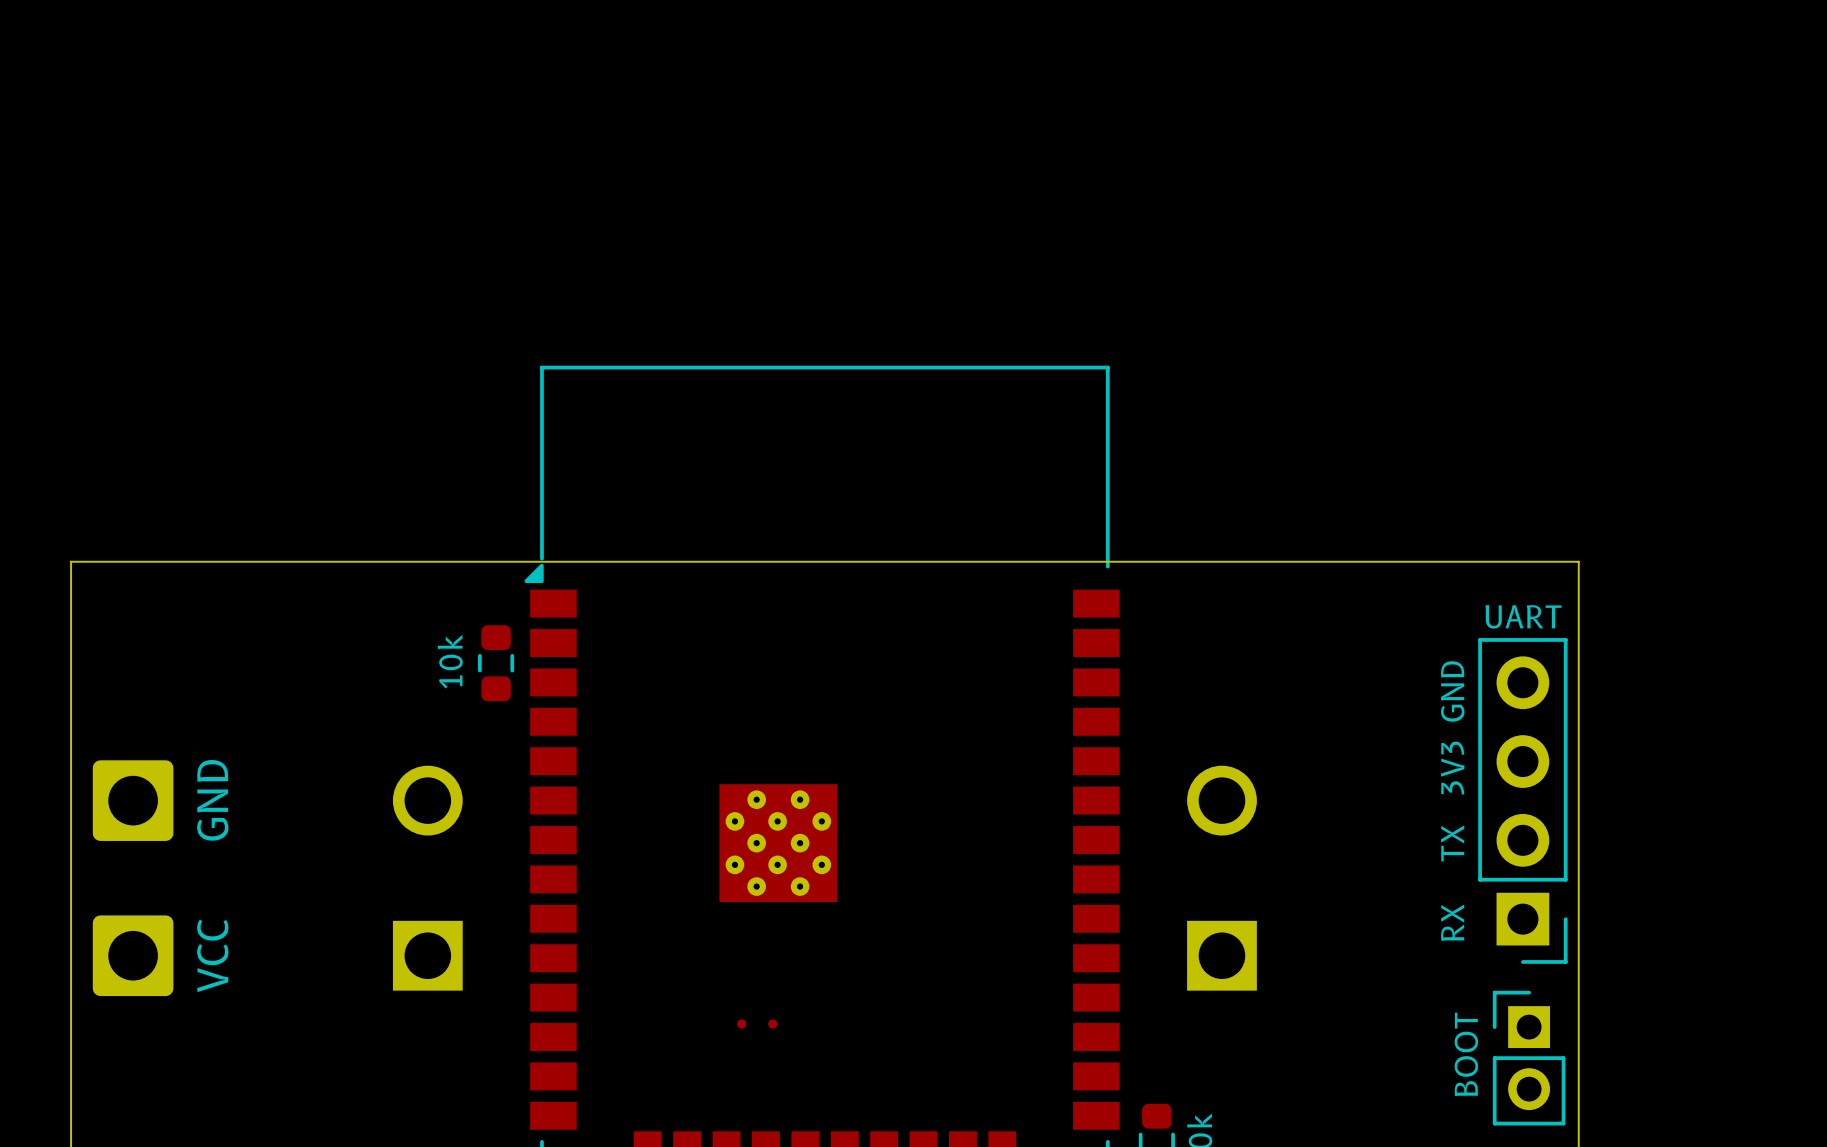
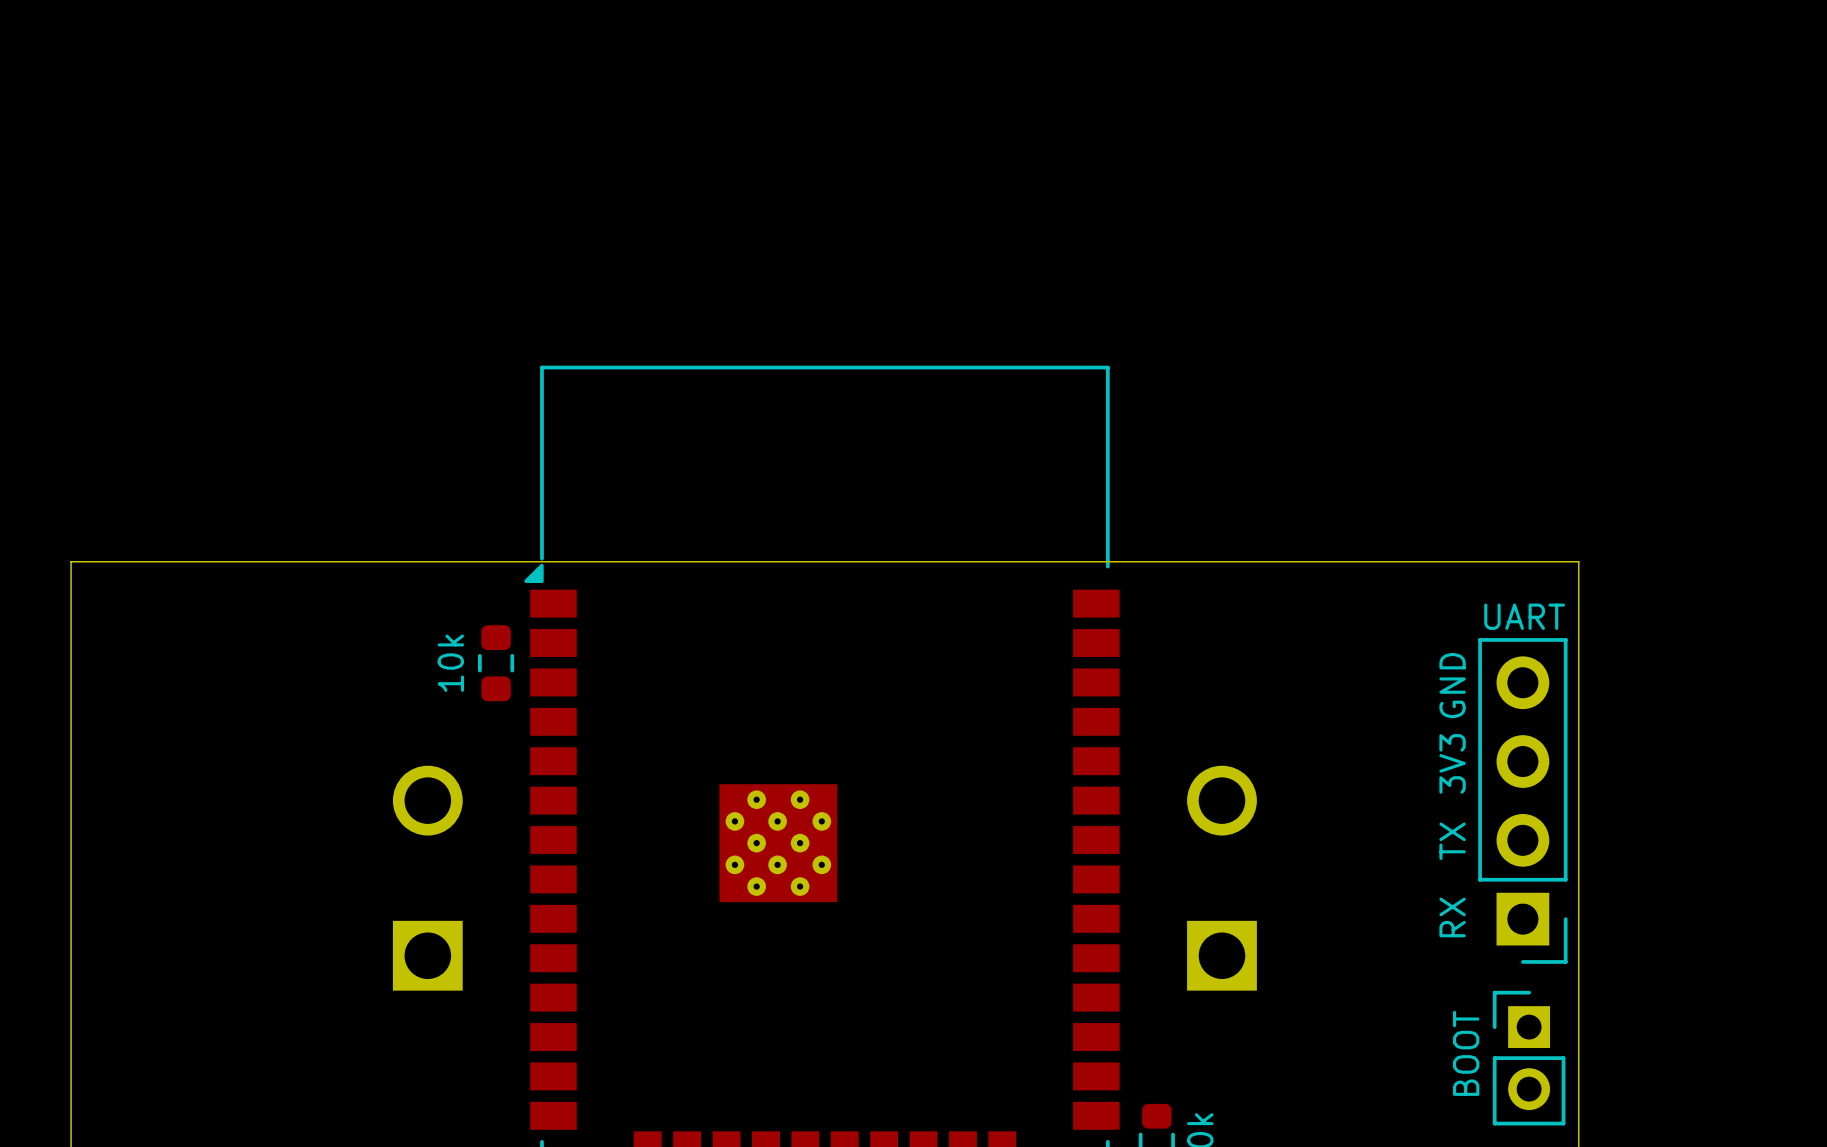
part: GND (133, 800) -> none
part: VCC (133, 955) -> none
part: (757, 1023) -> none

